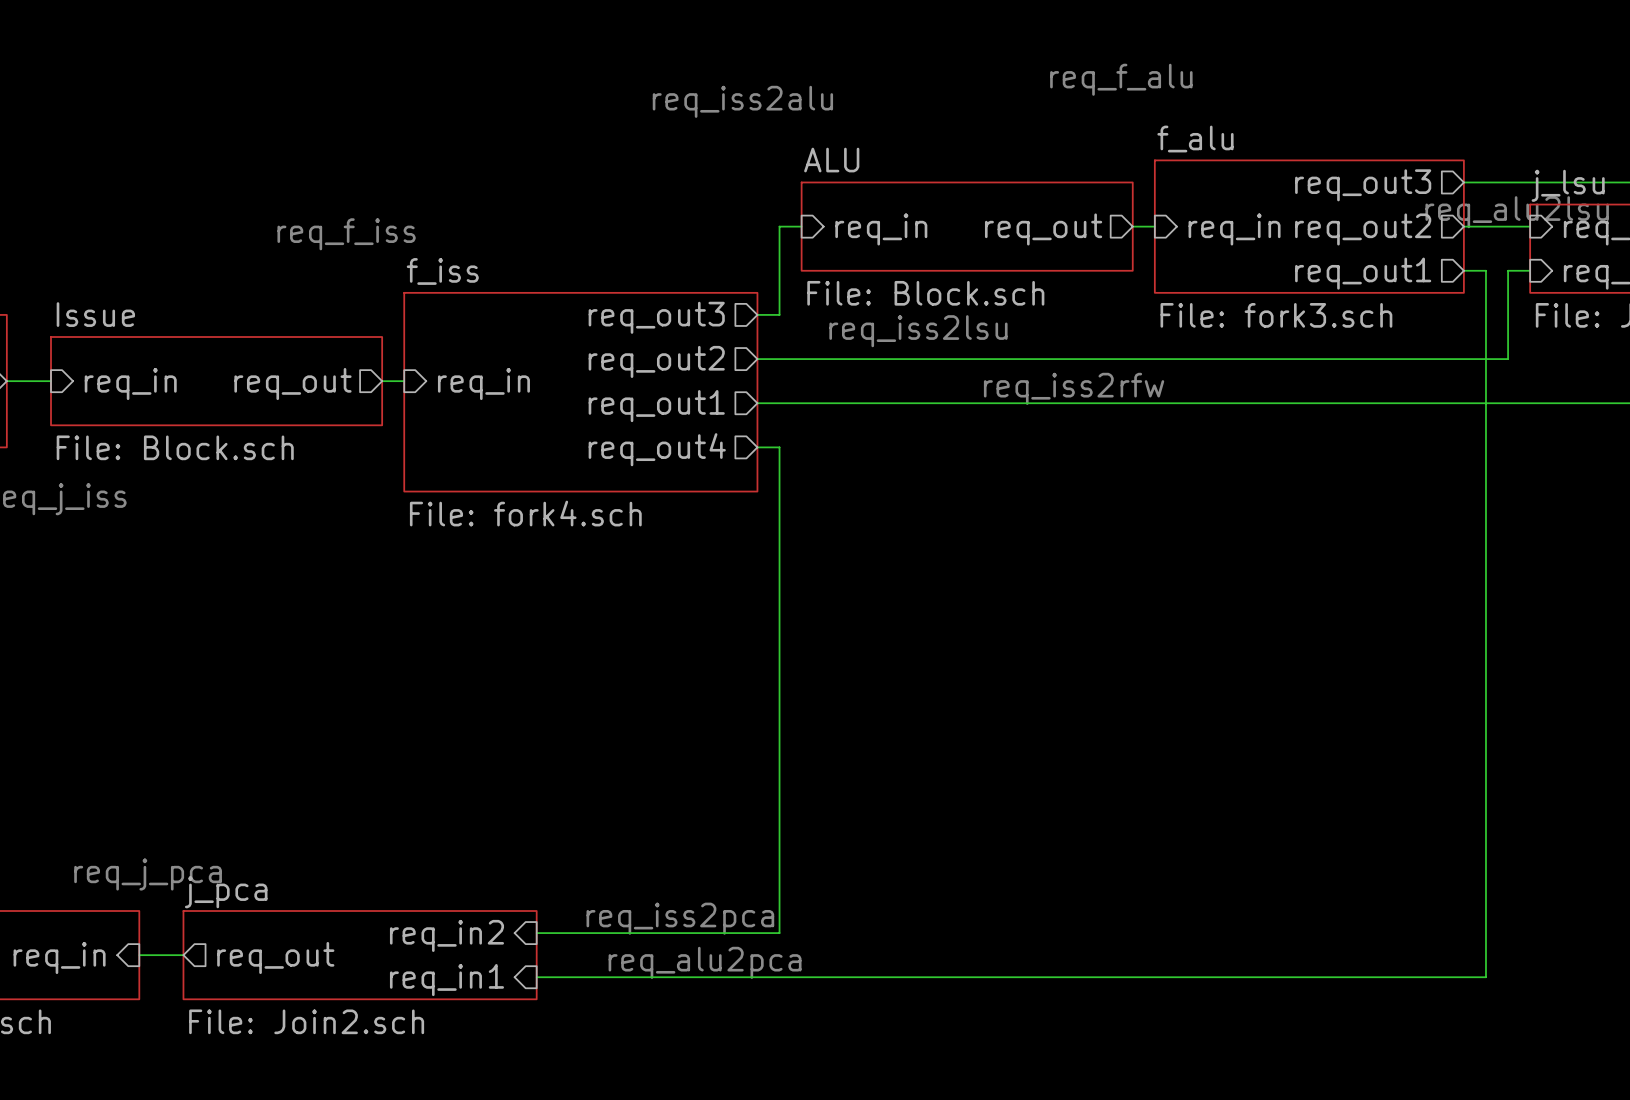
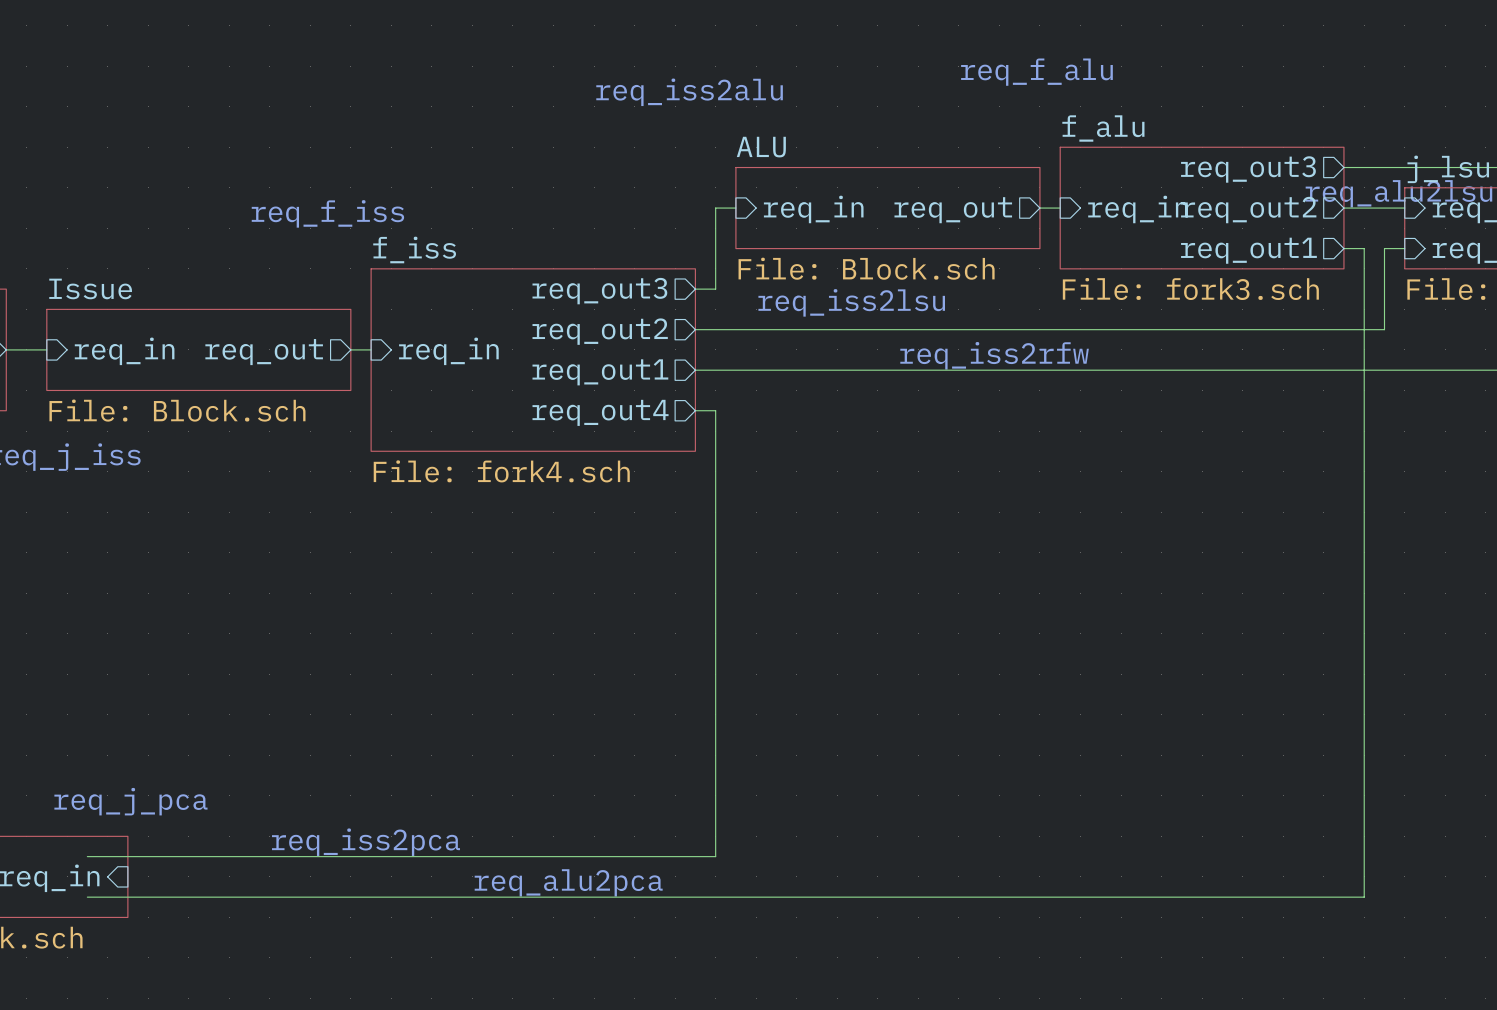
text position: req_iss2pca (680, 918) -> req_iss2pca (365, 842)
wire: none -> (87, 856) (492, 856)
sheet pin: req_in2 (446, 935) -> none
wire: (139, 955) (183, 955) -> none
sheet j_pca: File: Join2.sch (360, 955) -> none
sheet pin: req_out (275, 958) -> none
text position: req_alu2pca (705, 962) -> req_alu2pca (568, 882)
wire: none -> (87, 897) (492, 897)
sheet pin: req_in1 (446, 980) -> none

